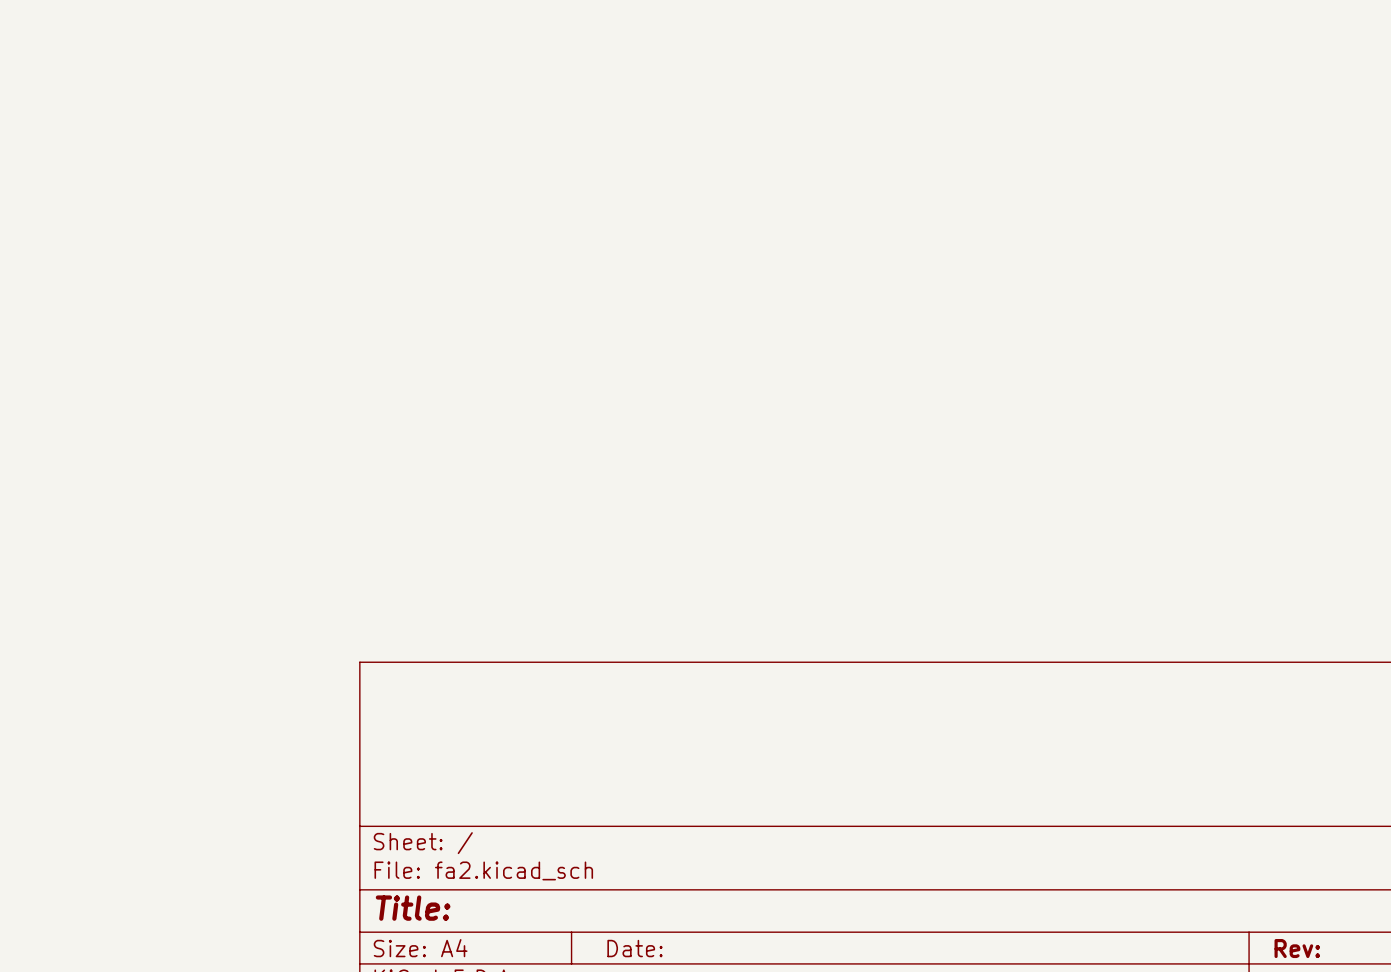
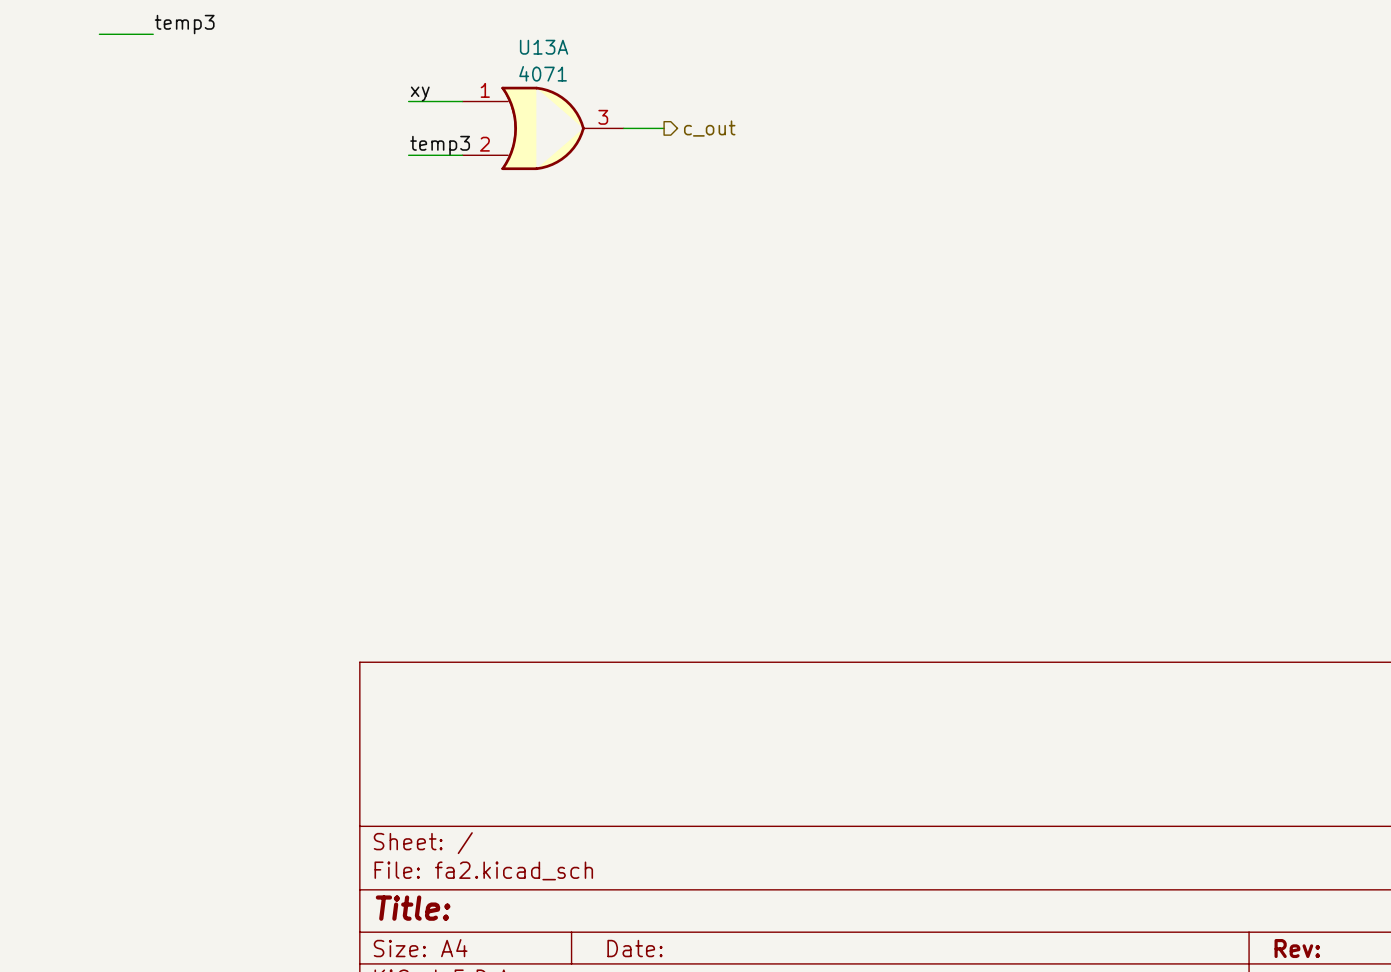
label: none -> temp3 (184, 24)
wire: none -> (99, 34) (153, 34)
label: none -> xy (420, 94)
wire: none -> (408, 101) (462, 101)
U13A: none -> 4071 (543, 128)
wire: none -> (623, 128) (664, 128)
hierarchical label: none -> c_out (709, 128)
label: none -> temp3 (440, 145)
wire: none -> (408, 155) (462, 155)

